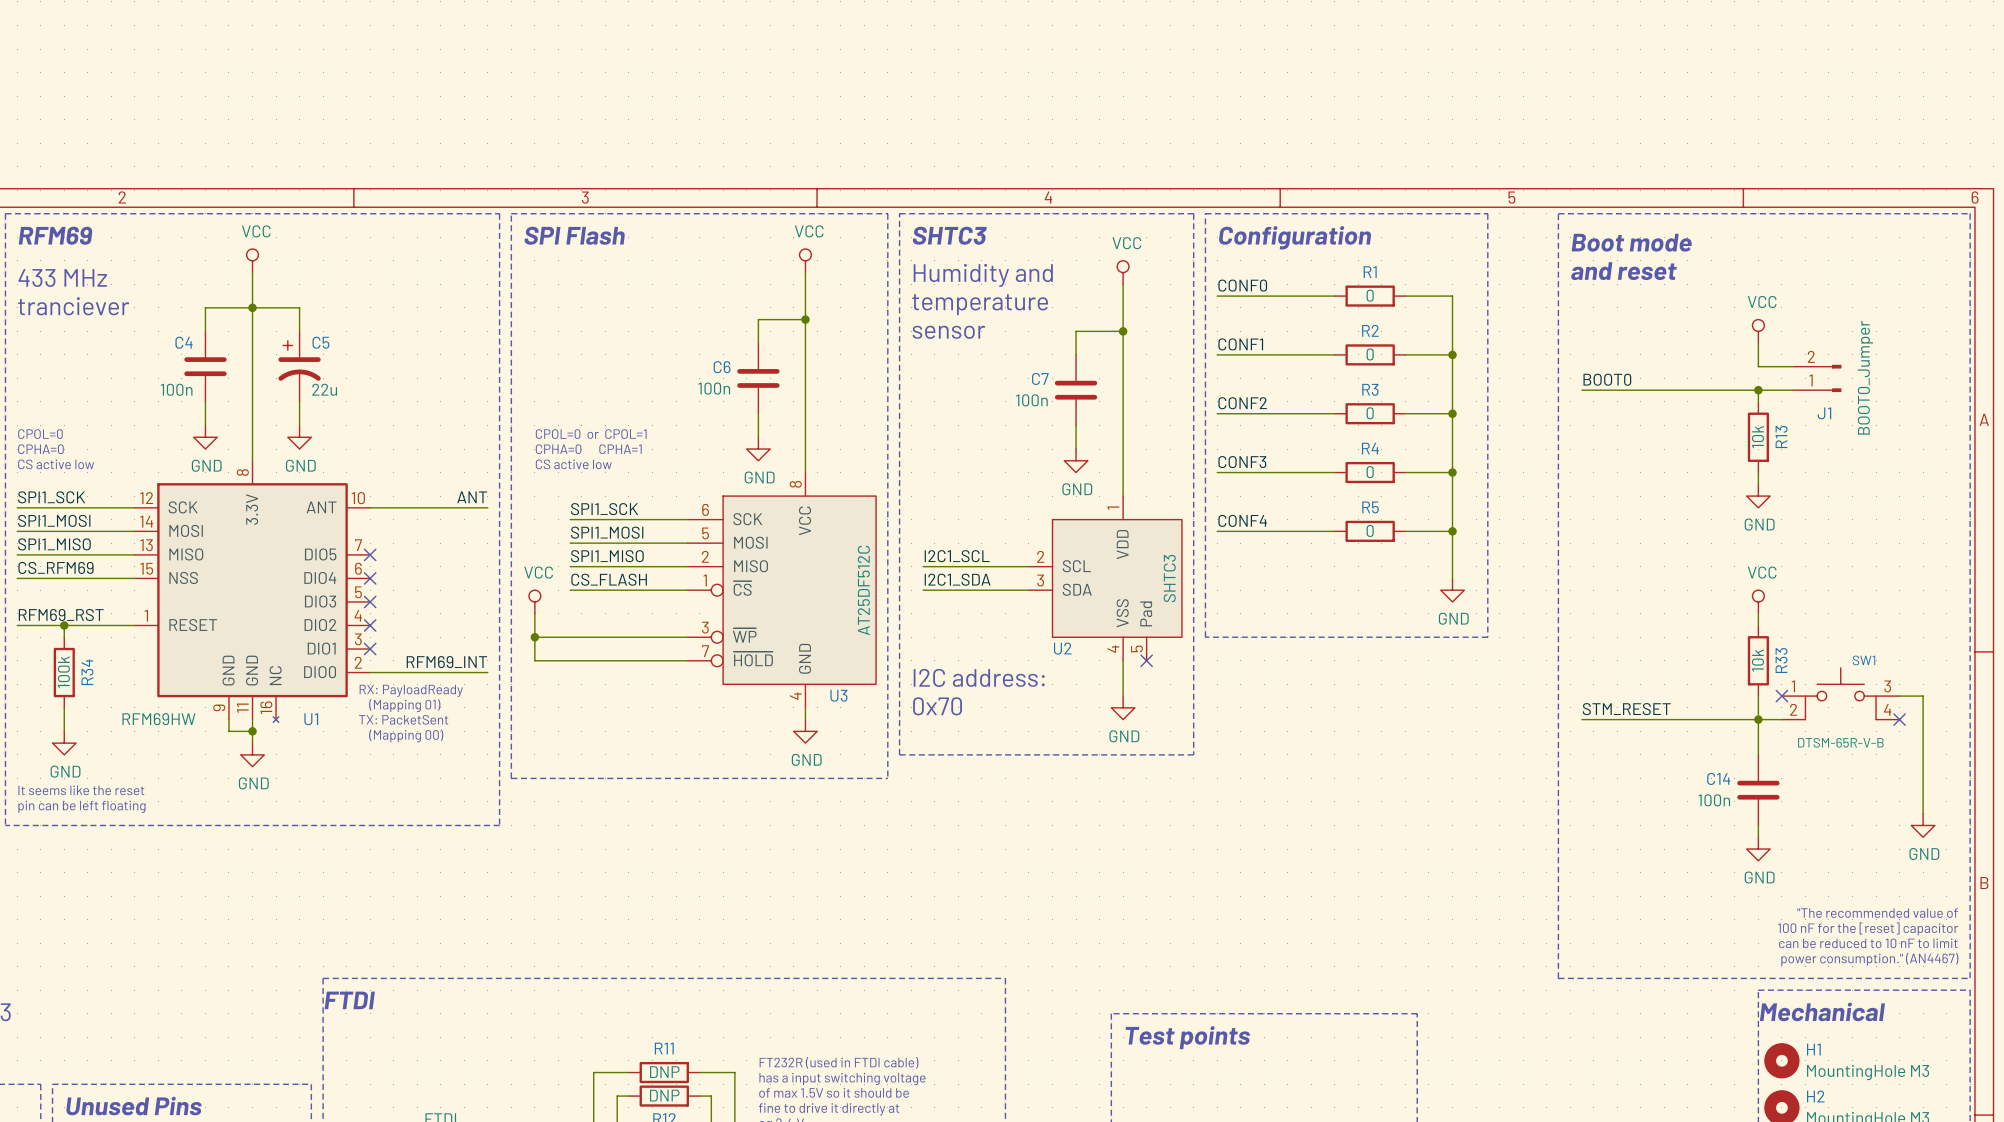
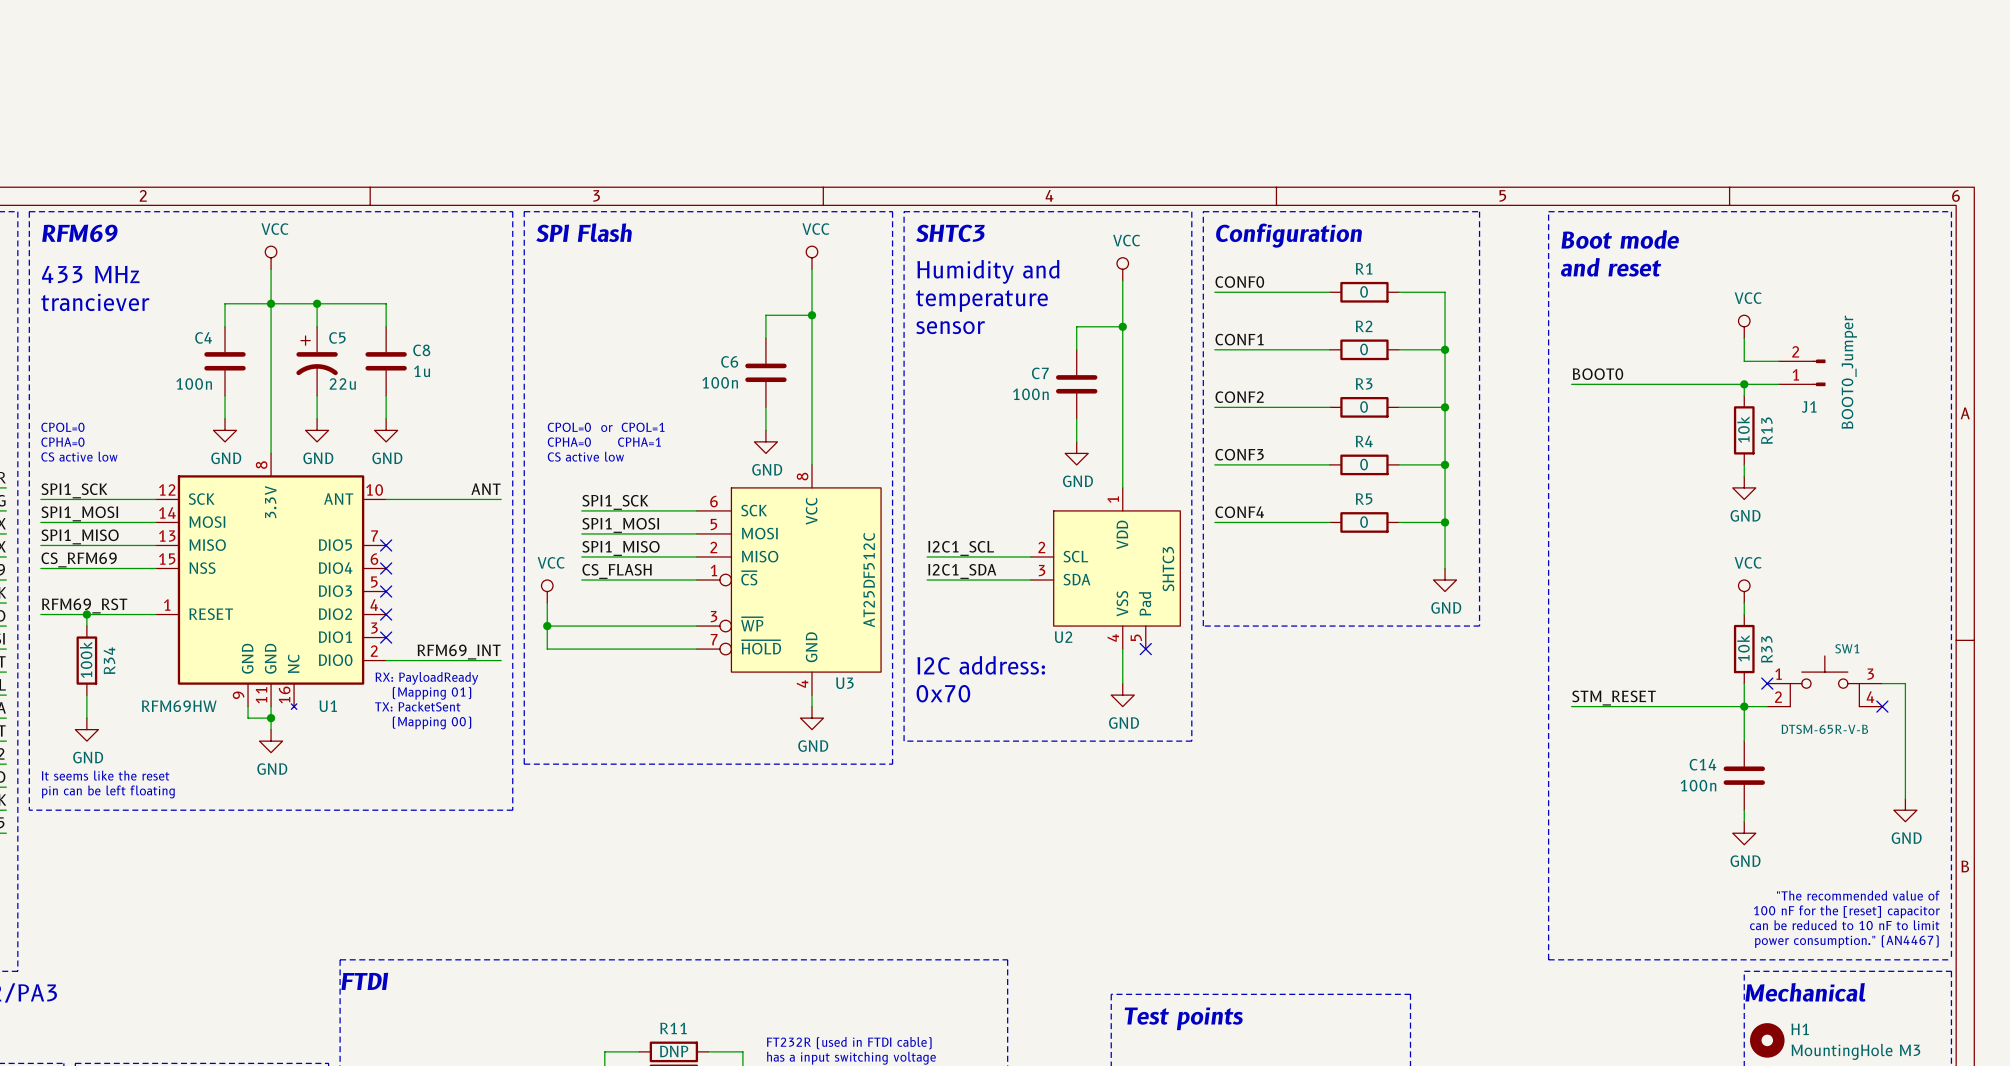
wire: none -> (317, 303) (386, 303) (386, 326)
junction: none -> (317, 303)
C8: none -> 1u (386, 361)
wire: none -> (386, 395) (386, 418)
power symbol: none -> GND (386, 430)

